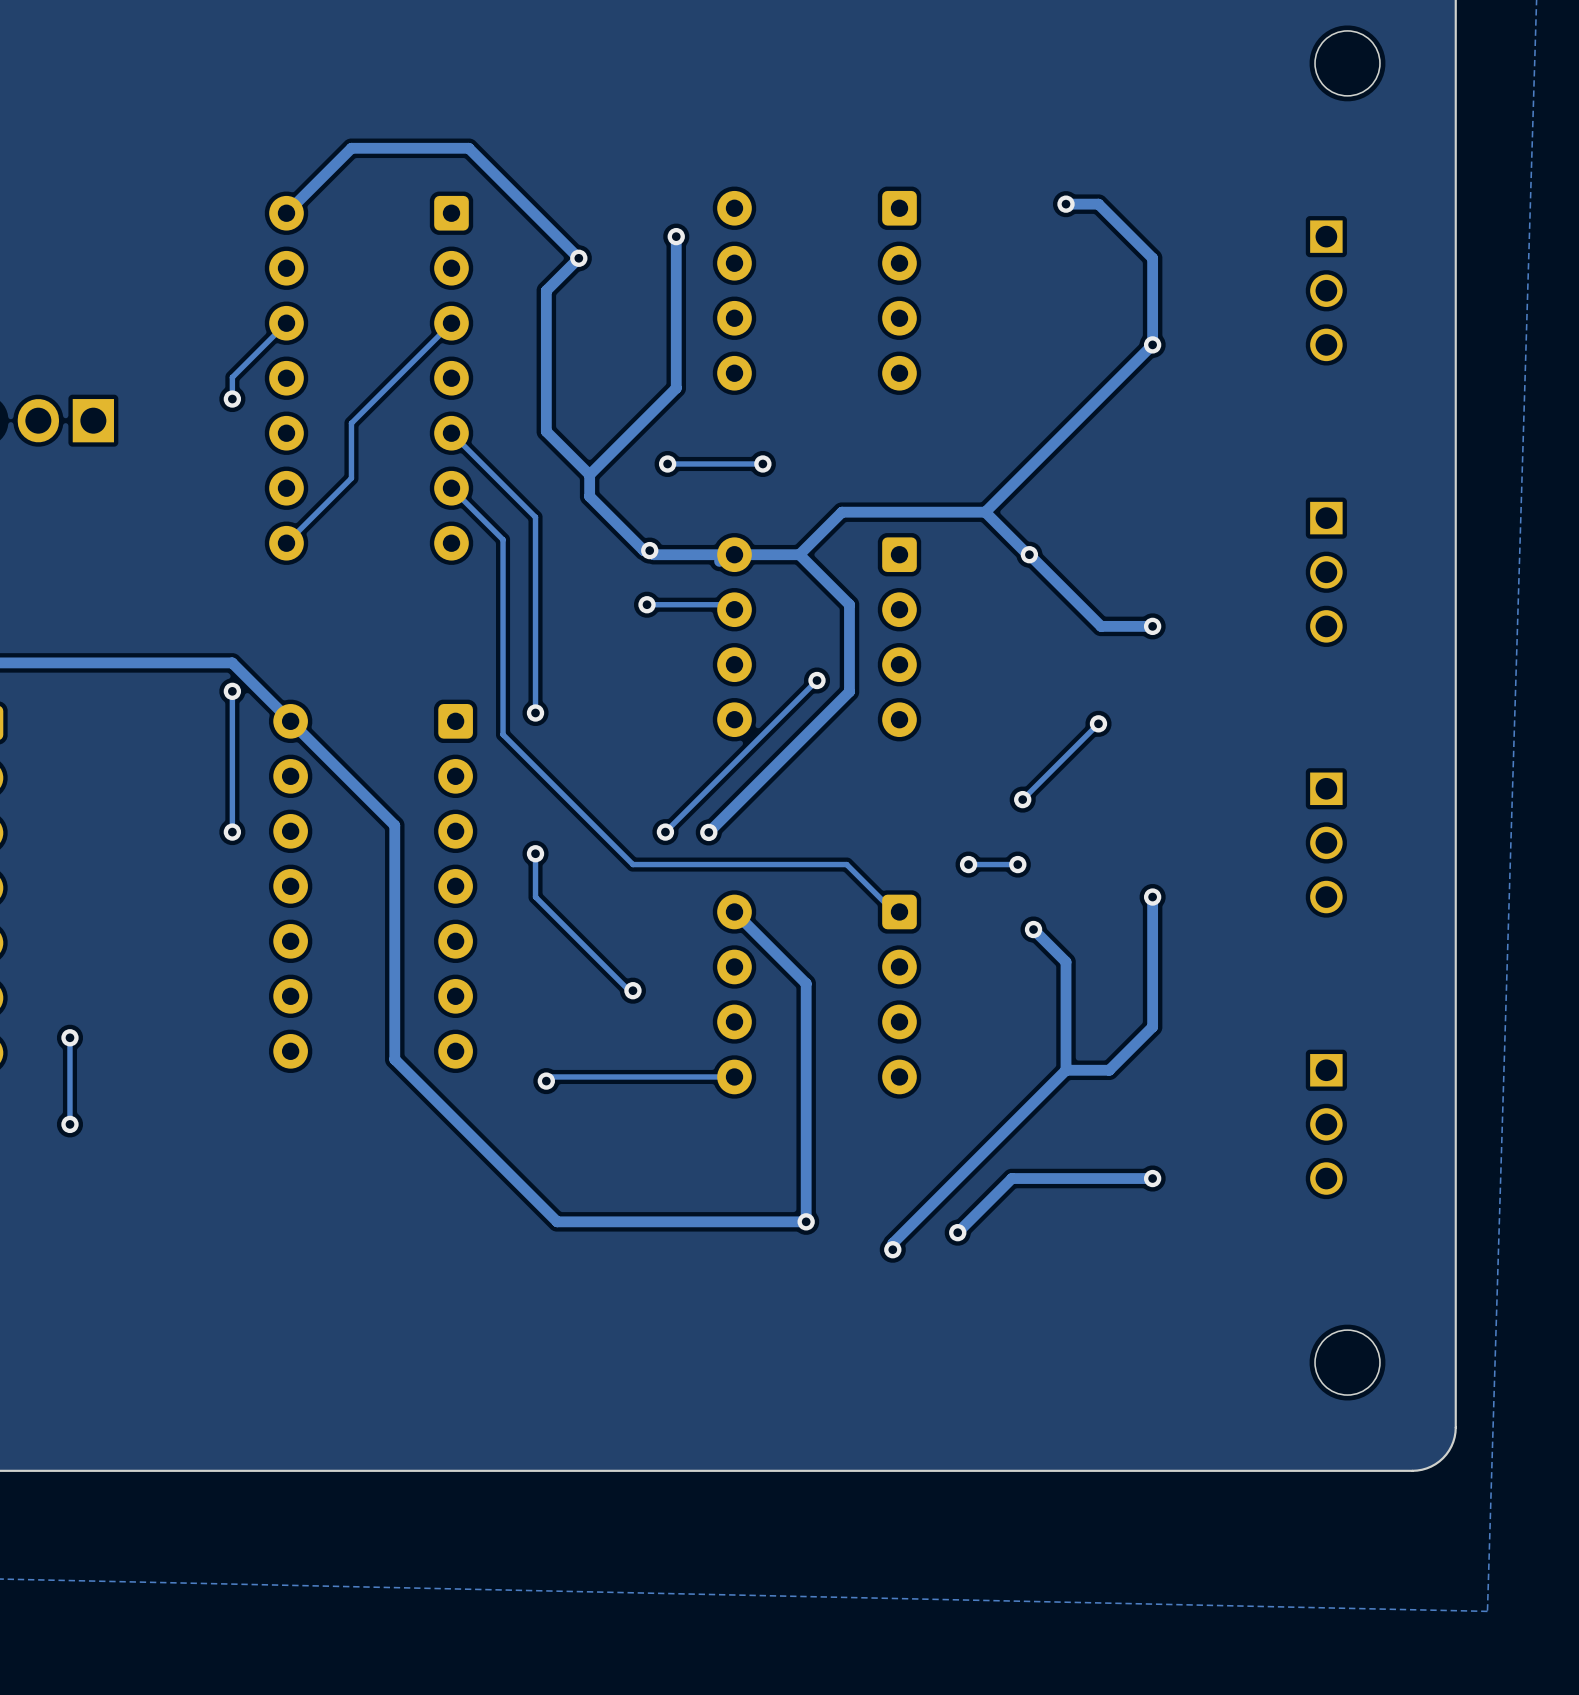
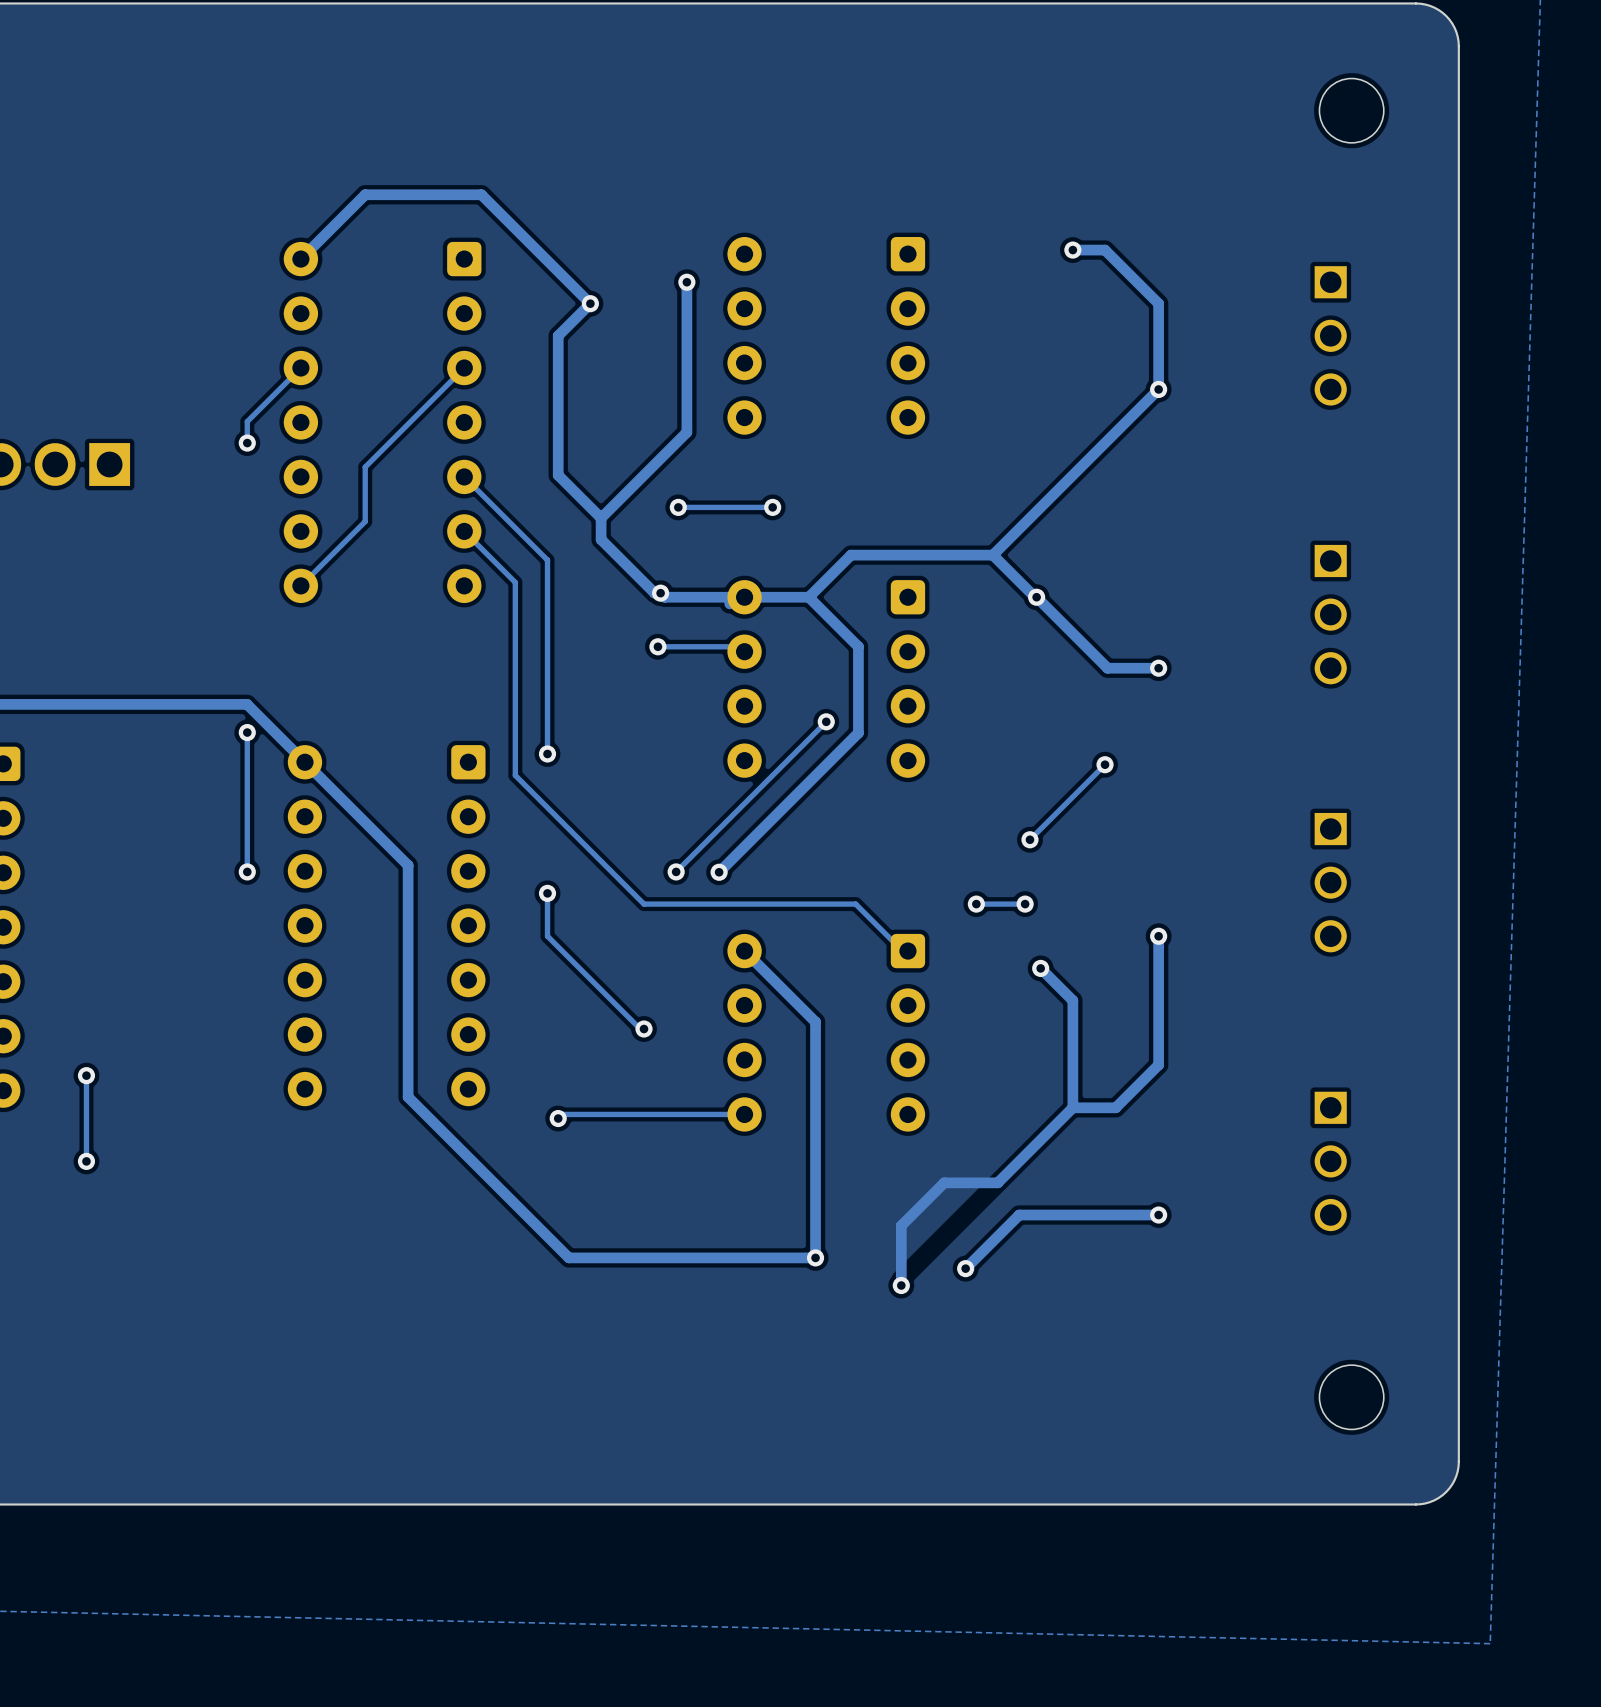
track: (990, 1146) (892, 1243) -> (997, 1182) (944, 1182) (901, 1225) (901, 1279)

